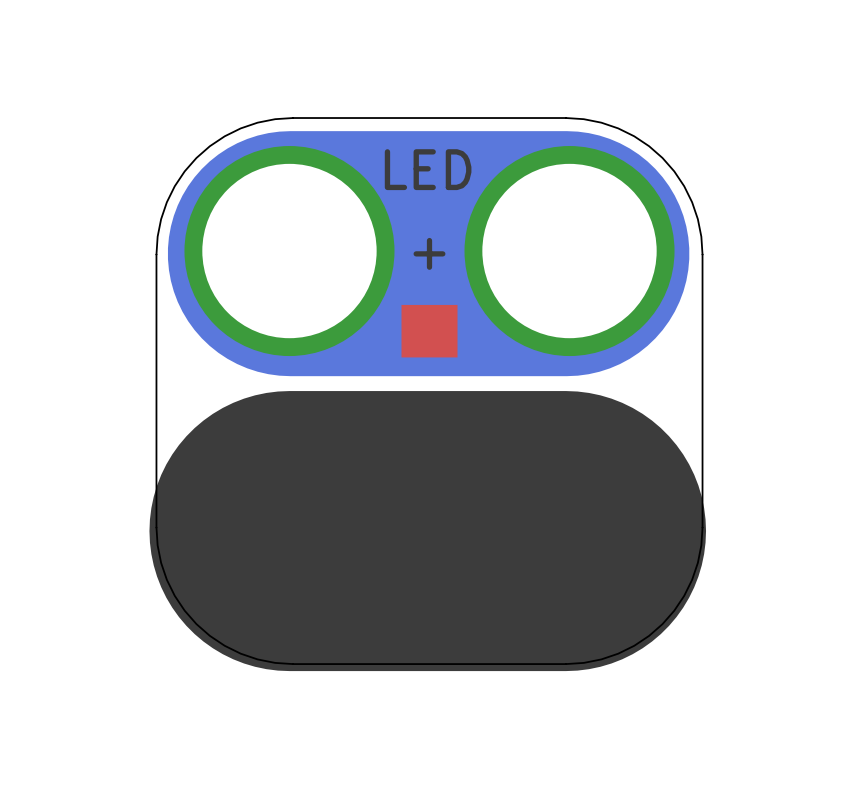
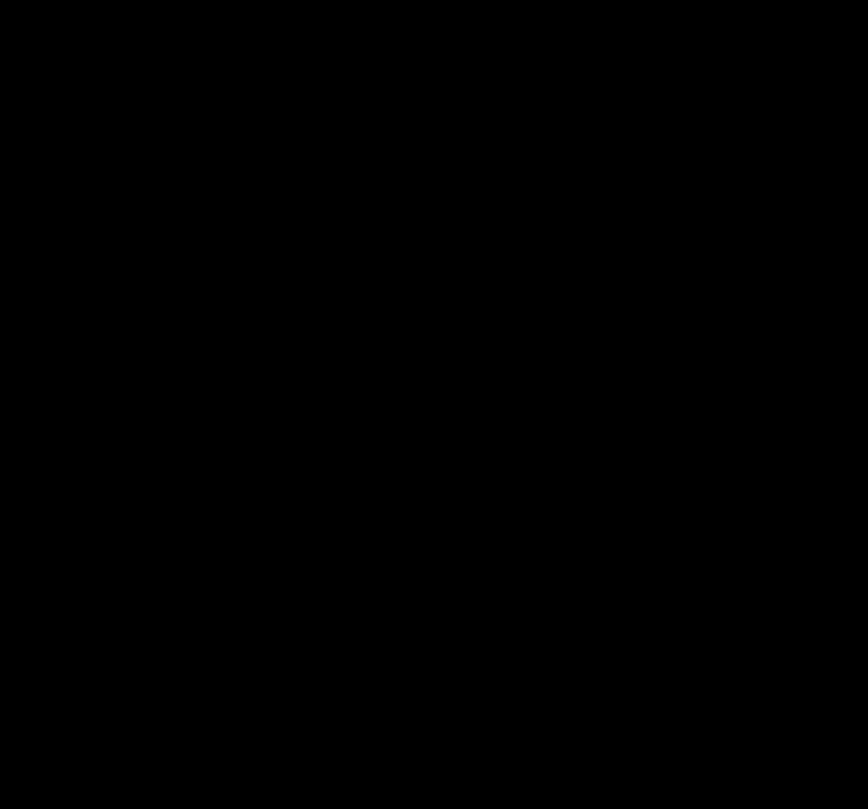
text: LED (428, 169) -> none
part: (427, 394) -> none

